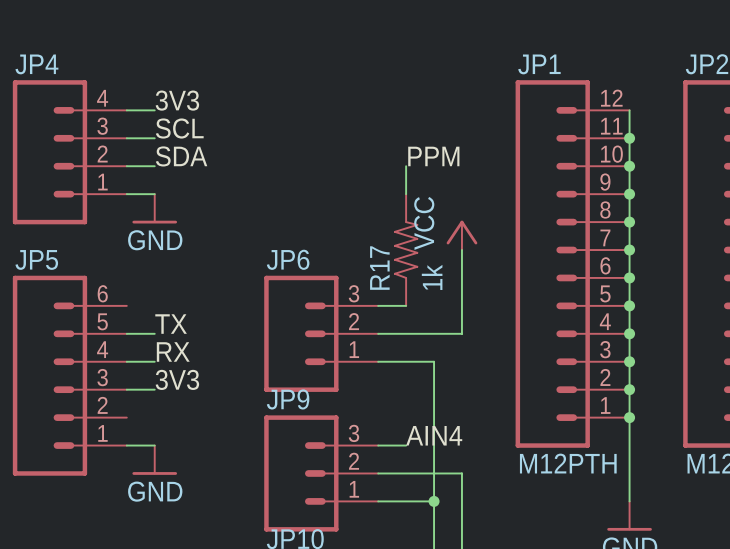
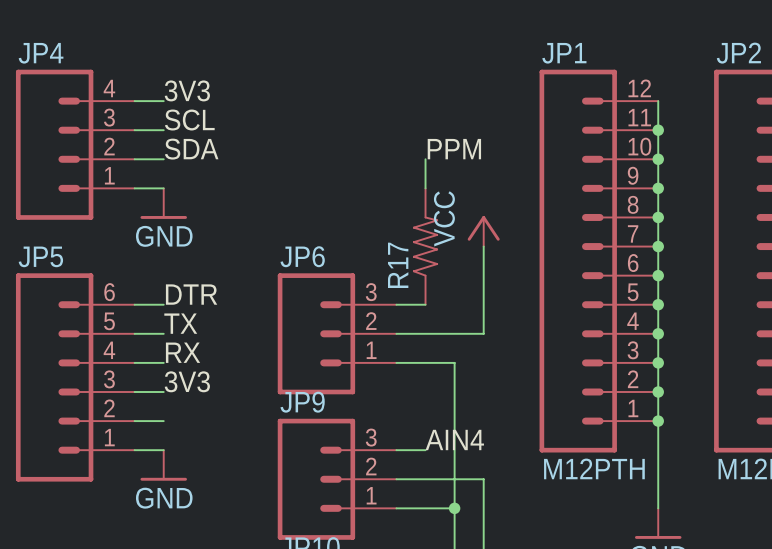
R17 value: 1k (432, 277) -> none
label: none -> DTR (191, 294)
wire: none -> (134, 304) (163, 304)
wire: none -> (134, 421) (163, 421)

